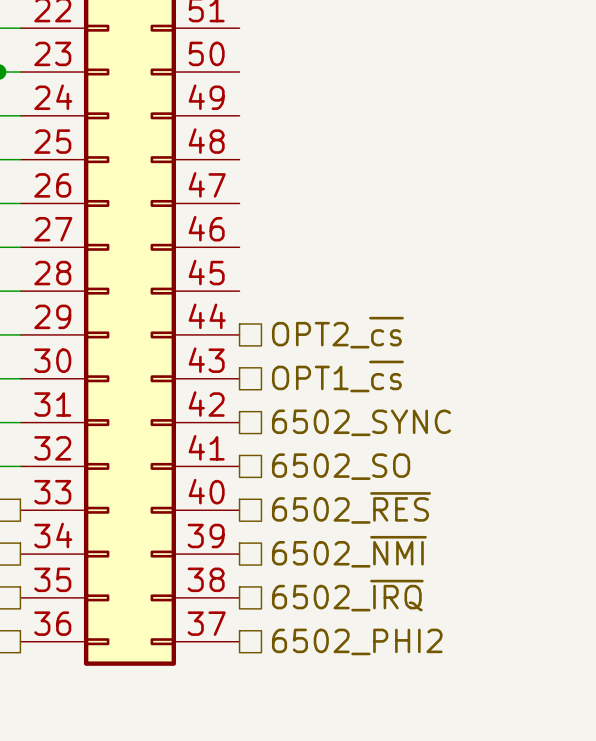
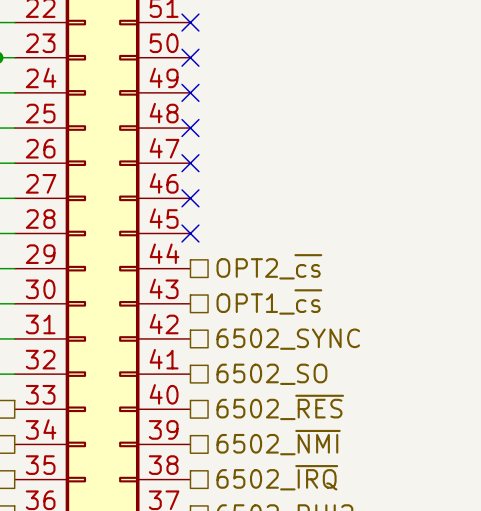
no-connect mark: none -> (190, 22)
no-connect mark: none -> (190, 57)
no-connect mark: none -> (190, 92)
no-connect mark: none -> (190, 128)
no-connect mark: none -> (190, 163)
no-connect mark: none -> (190, 198)
no-connect mark: none -> (190, 233)

